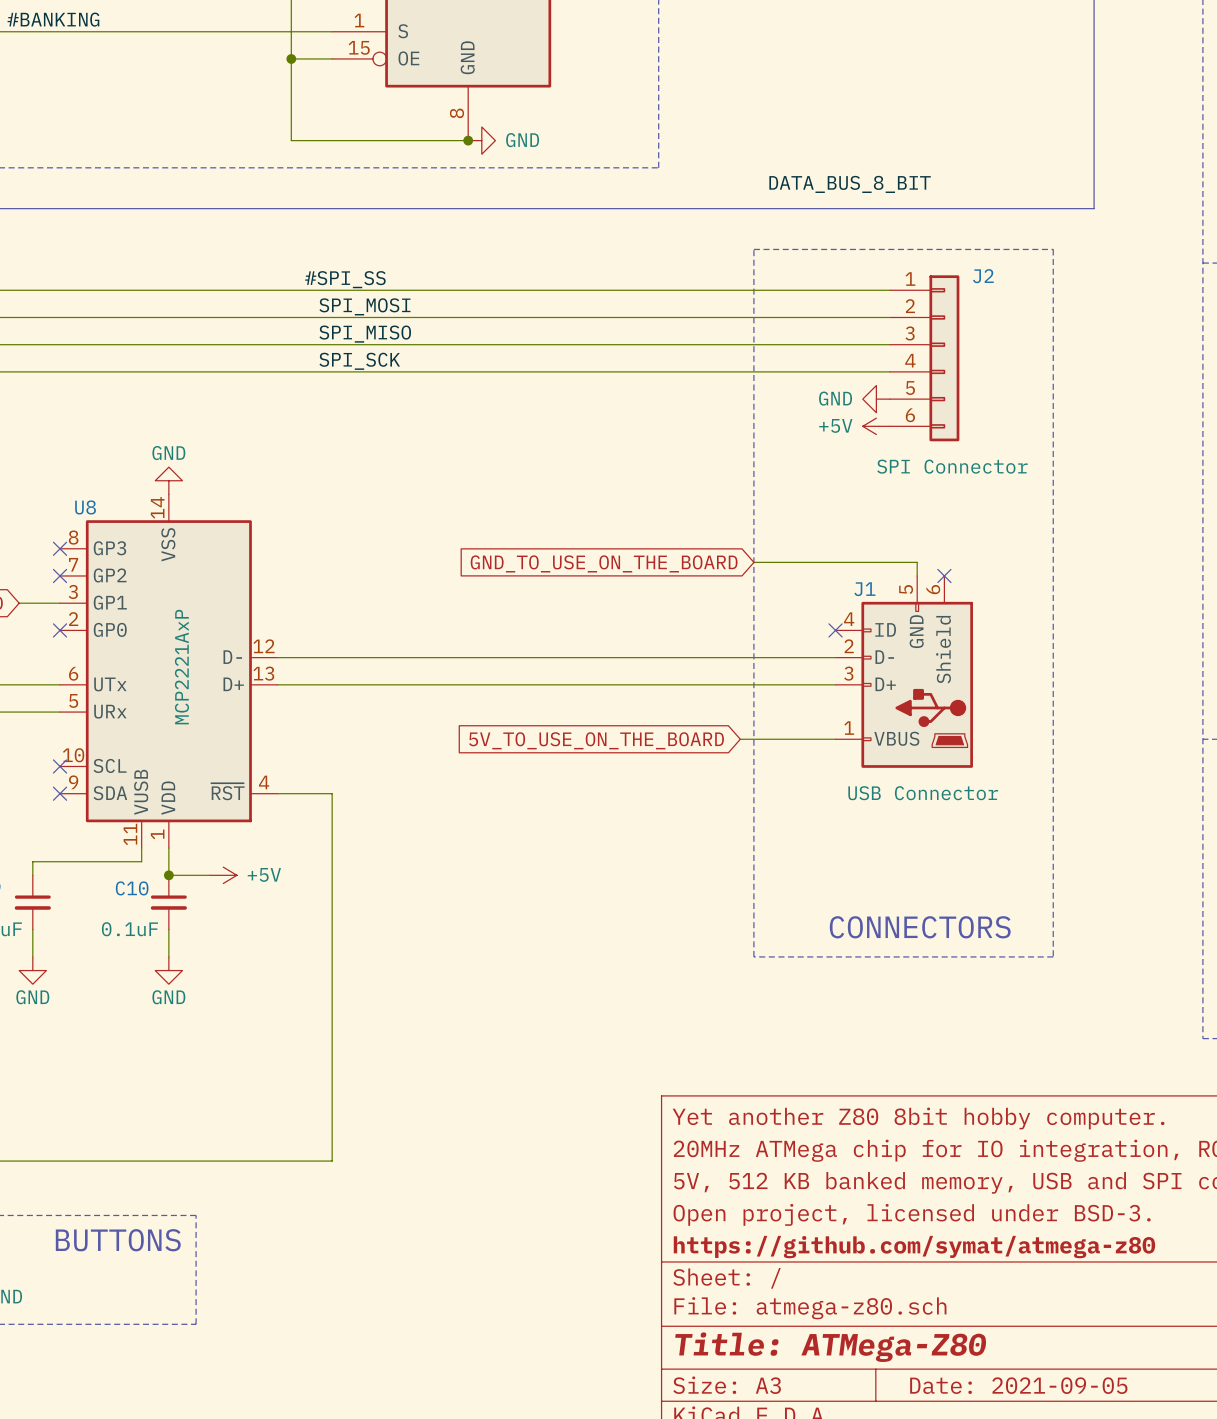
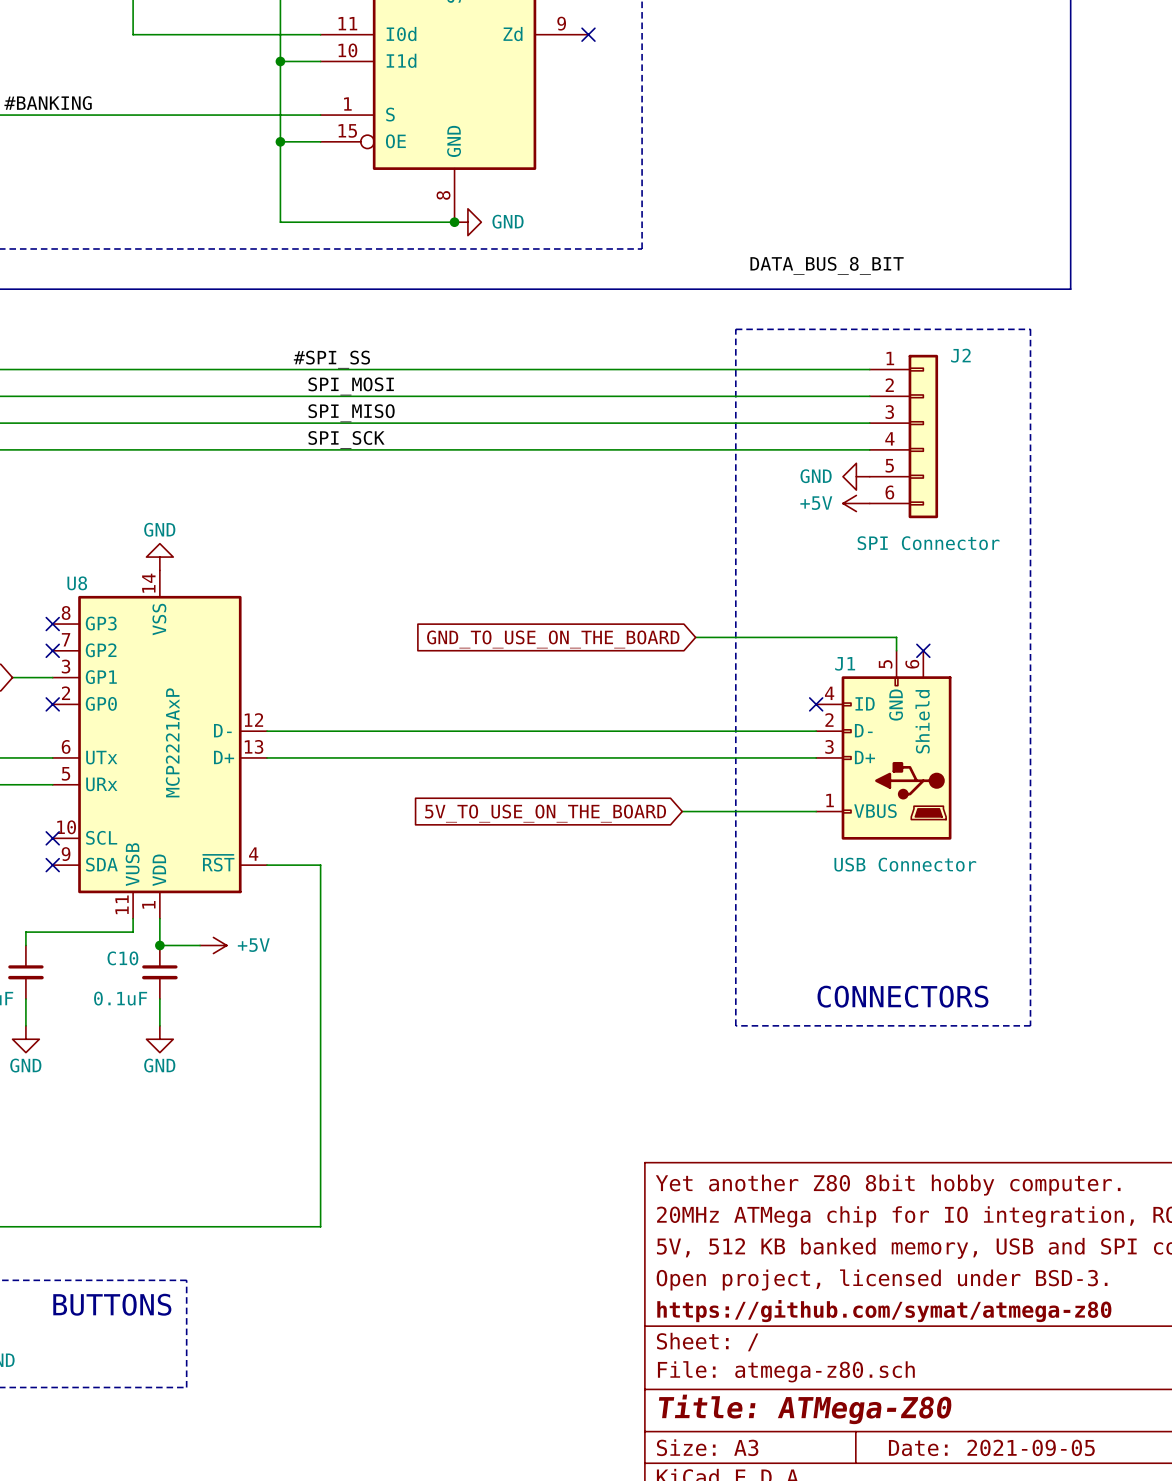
wire: none -> (695, 637) (735, 637)
global label position: GND_TO_USE_ON_THE_BOARD (604, 563) -> GND_TO_USE_ON_THE_BOARD (553, 639)
wire: none -> (682, 811) (722, 811)
global label position: 5V_TO_USE_ON_THE_BOARD (596, 740) -> 5V_TO_USE_ON_THE_BOARD (545, 813)

